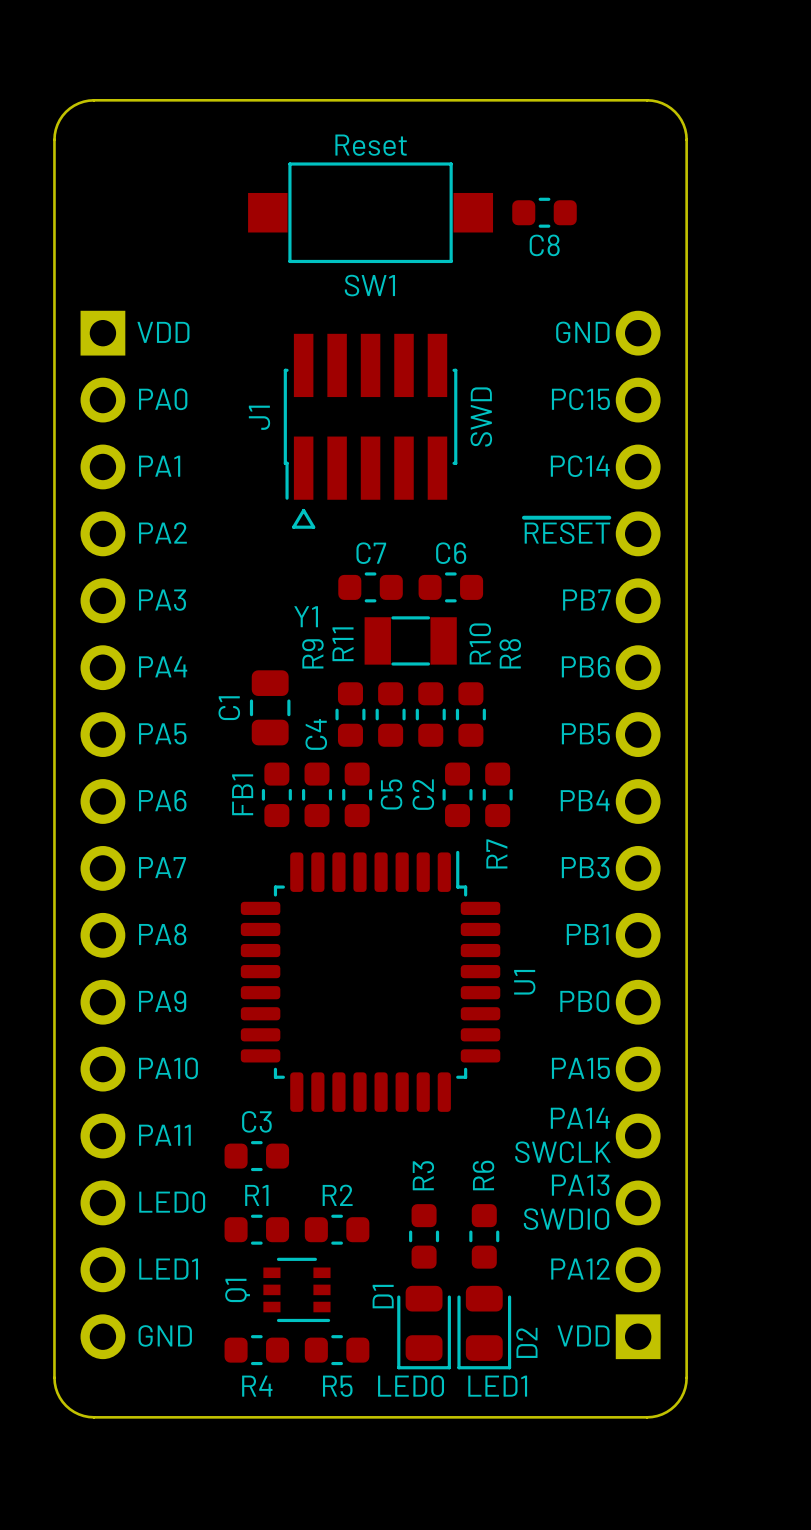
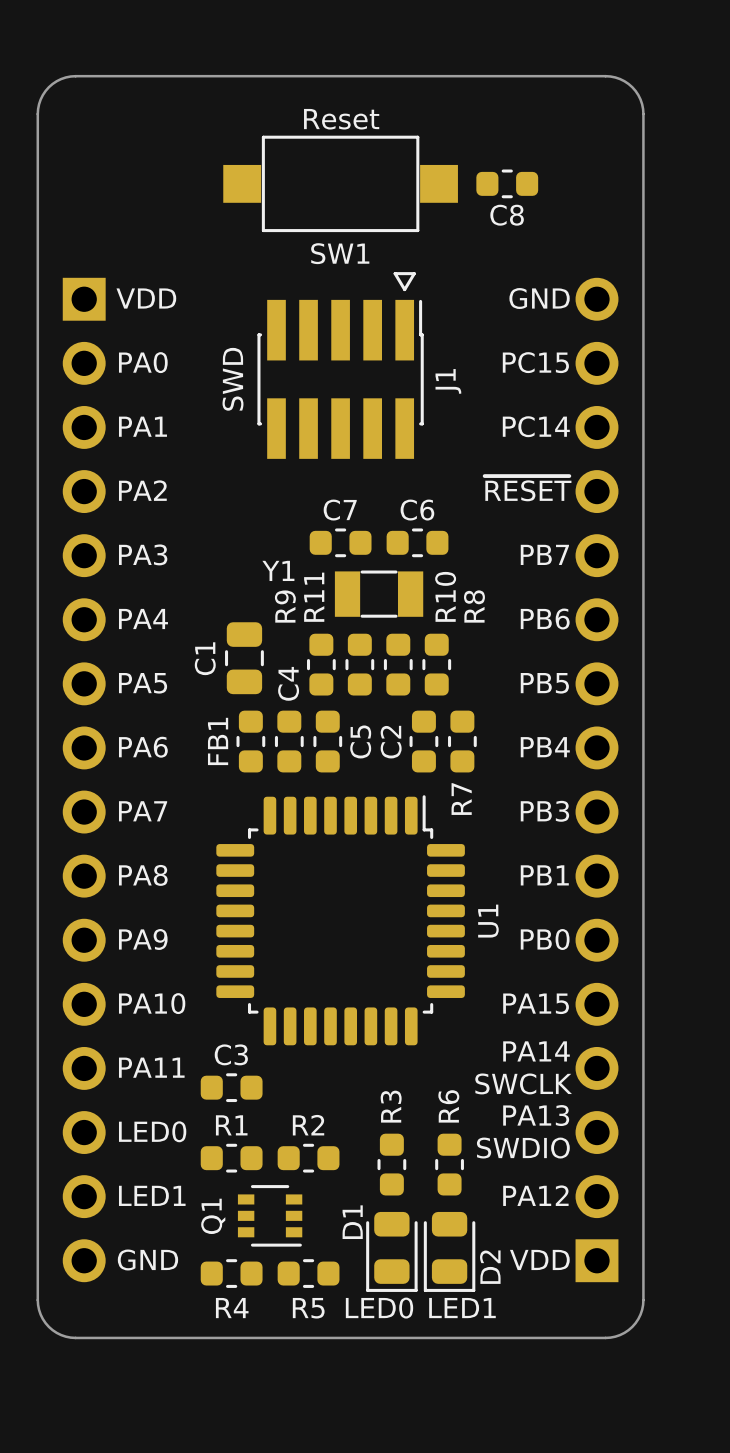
line: none -> (395, 273) (404, 289) (414, 273) (395, 273)
J1 rotation: 0° (370, 416) -> 180° (340, 379)
line: (303, 510) (293, 527) (313, 527) (303, 510) -> none

